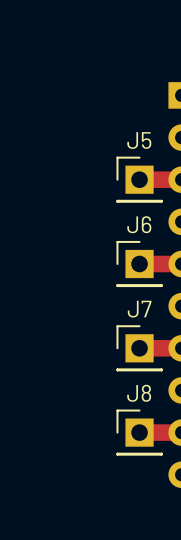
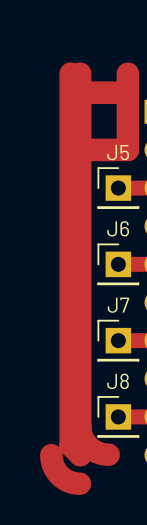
track: none -> (70, 73) (70, 445) (80, 455) (80, 73)
track: none -> (127, 73) (127, 149) (80, 149)
track: none -> (80, 92) (127, 92)
track: none -> (80, 426) (82, 437) (88, 446) (97, 452) (108, 454)
track: none -> (51, 455) (53, 466) (59, 475) (68, 481) (79, 483)

